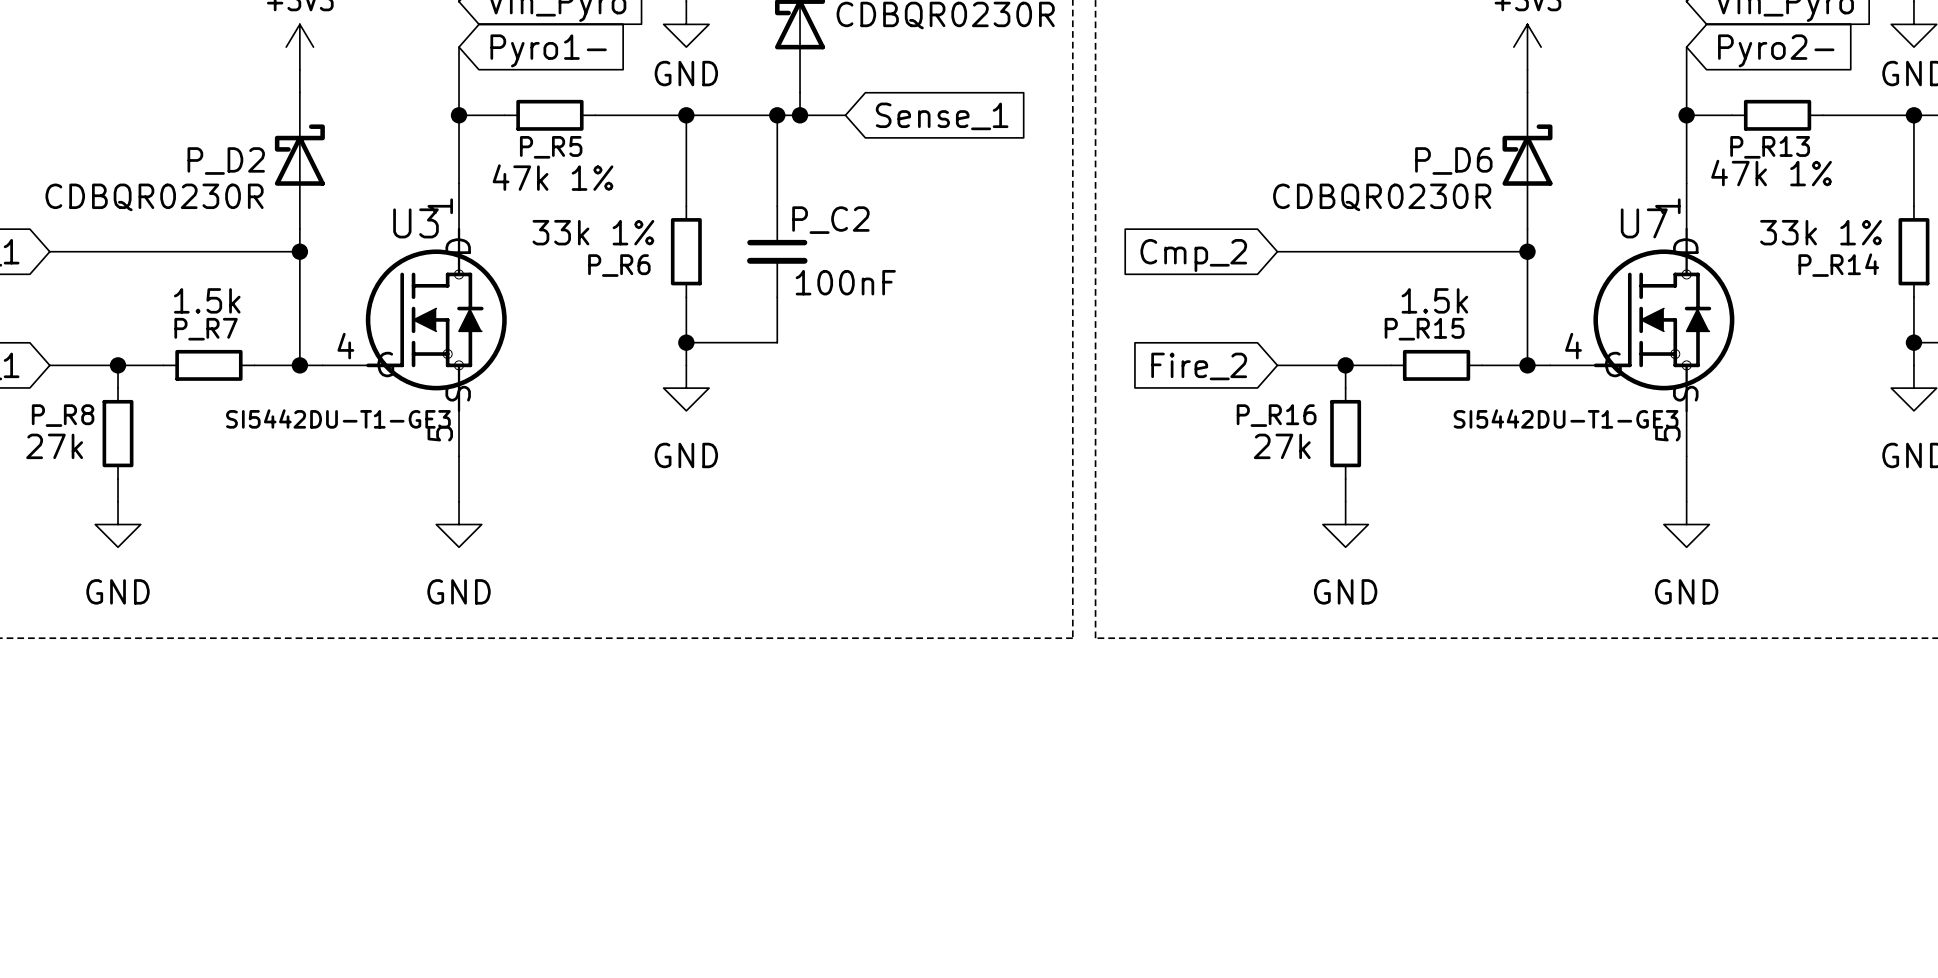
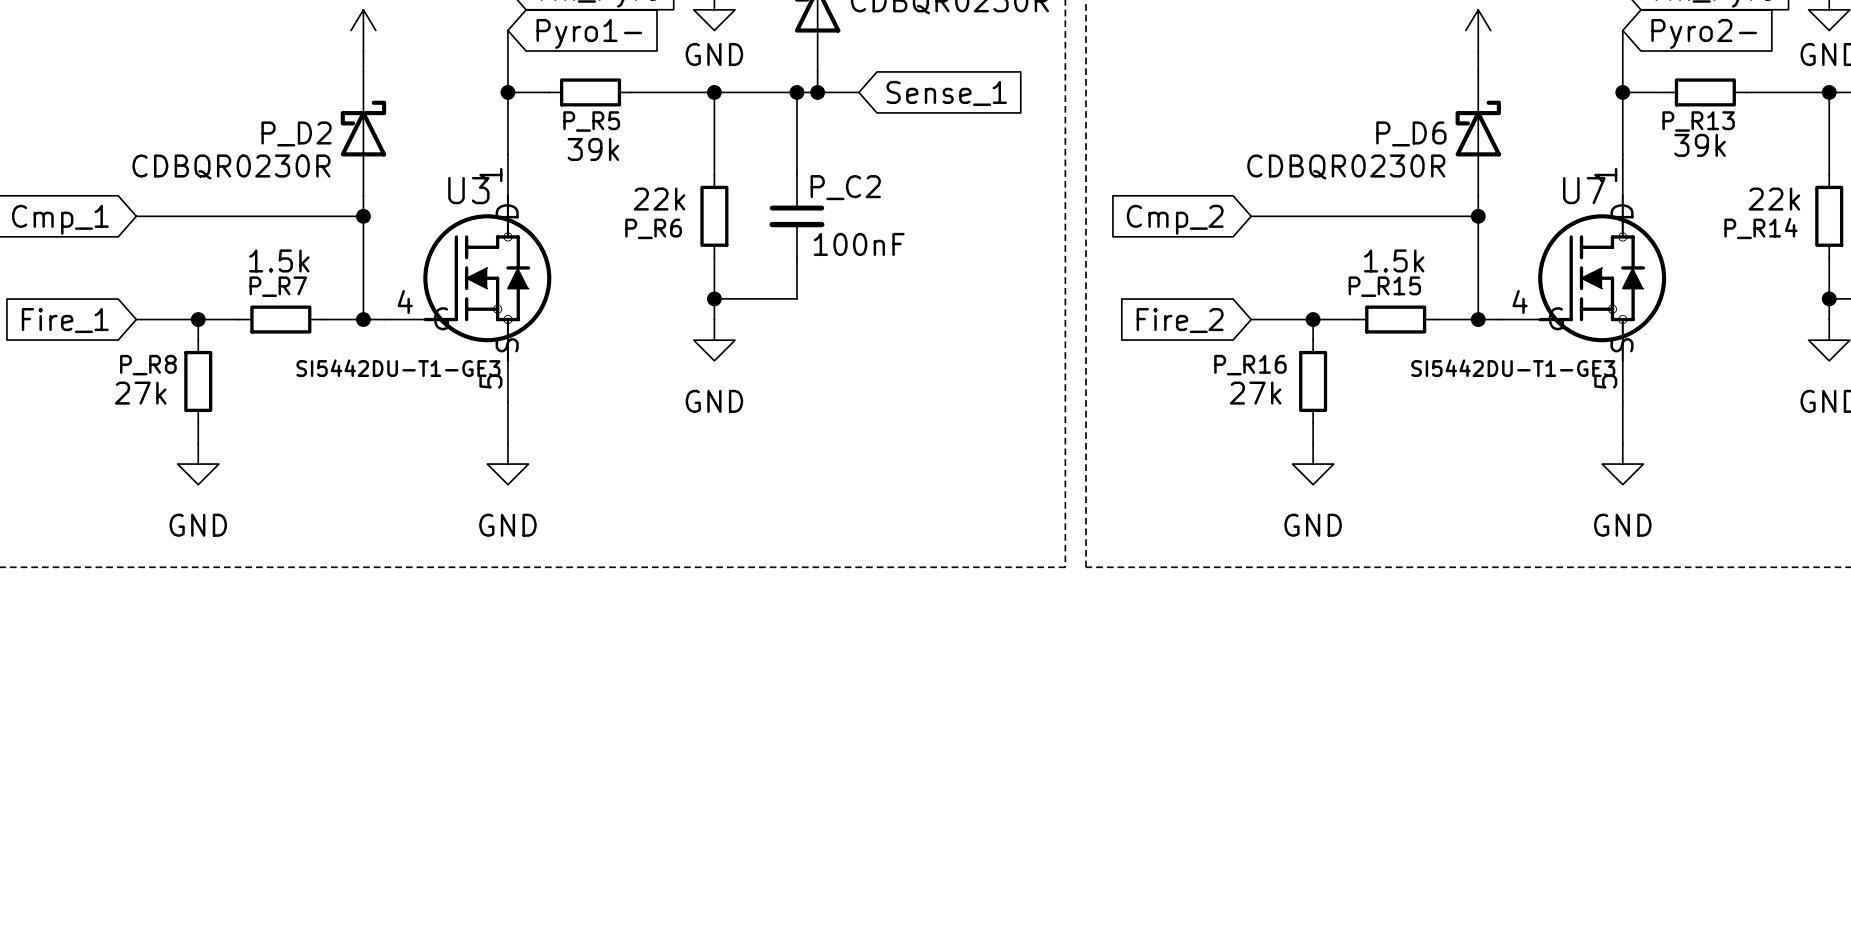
P_R13 value: 47k 1% (1771, 173) -> 39k (1700, 145)
P_R5 value: 47k 1% (553, 177) -> 39k (593, 149)
P_R6 value: 33k 1% (593, 232) -> 22k (659, 199)
P_R14 value: 33k 1% (1821, 232) -> 22k (1774, 199)

